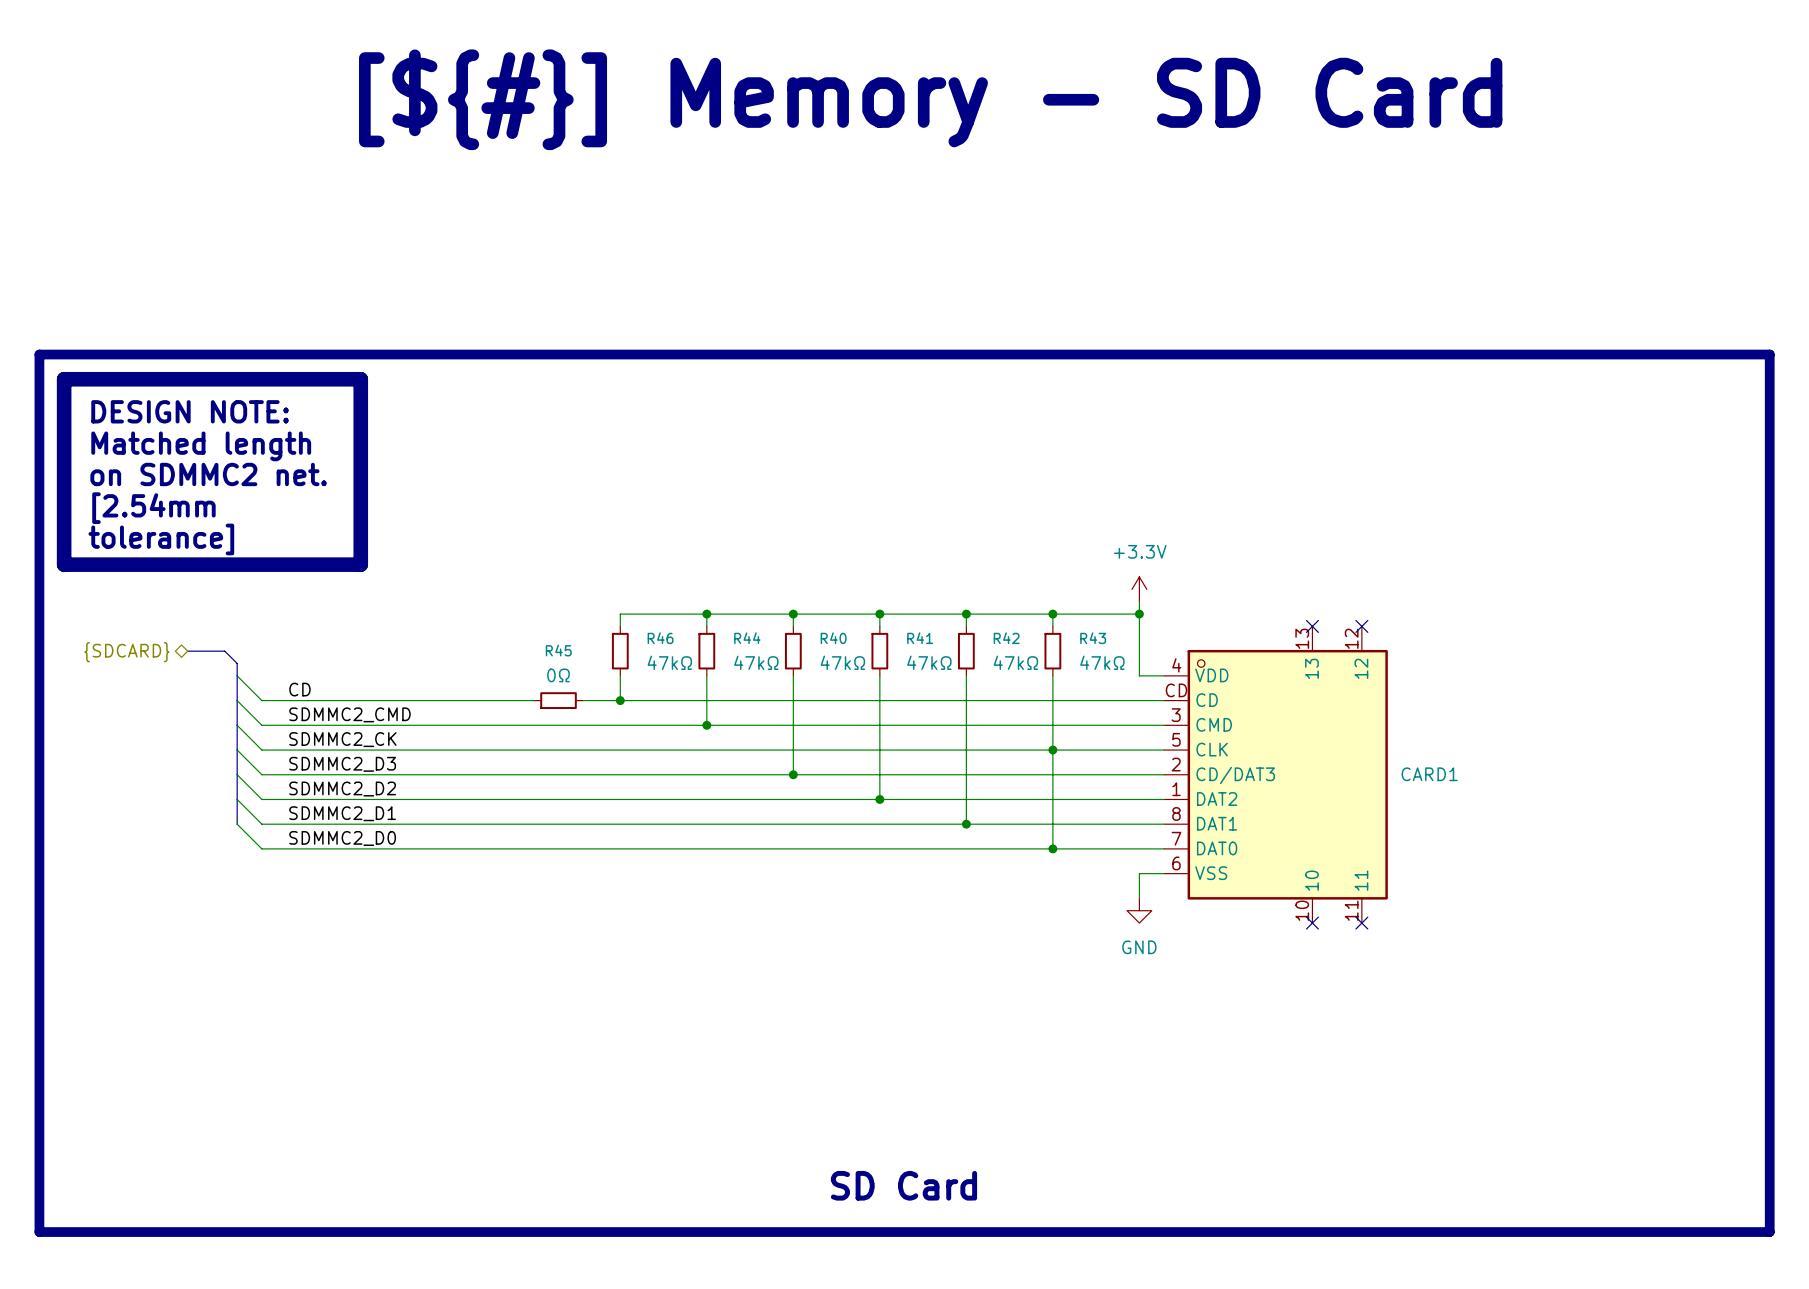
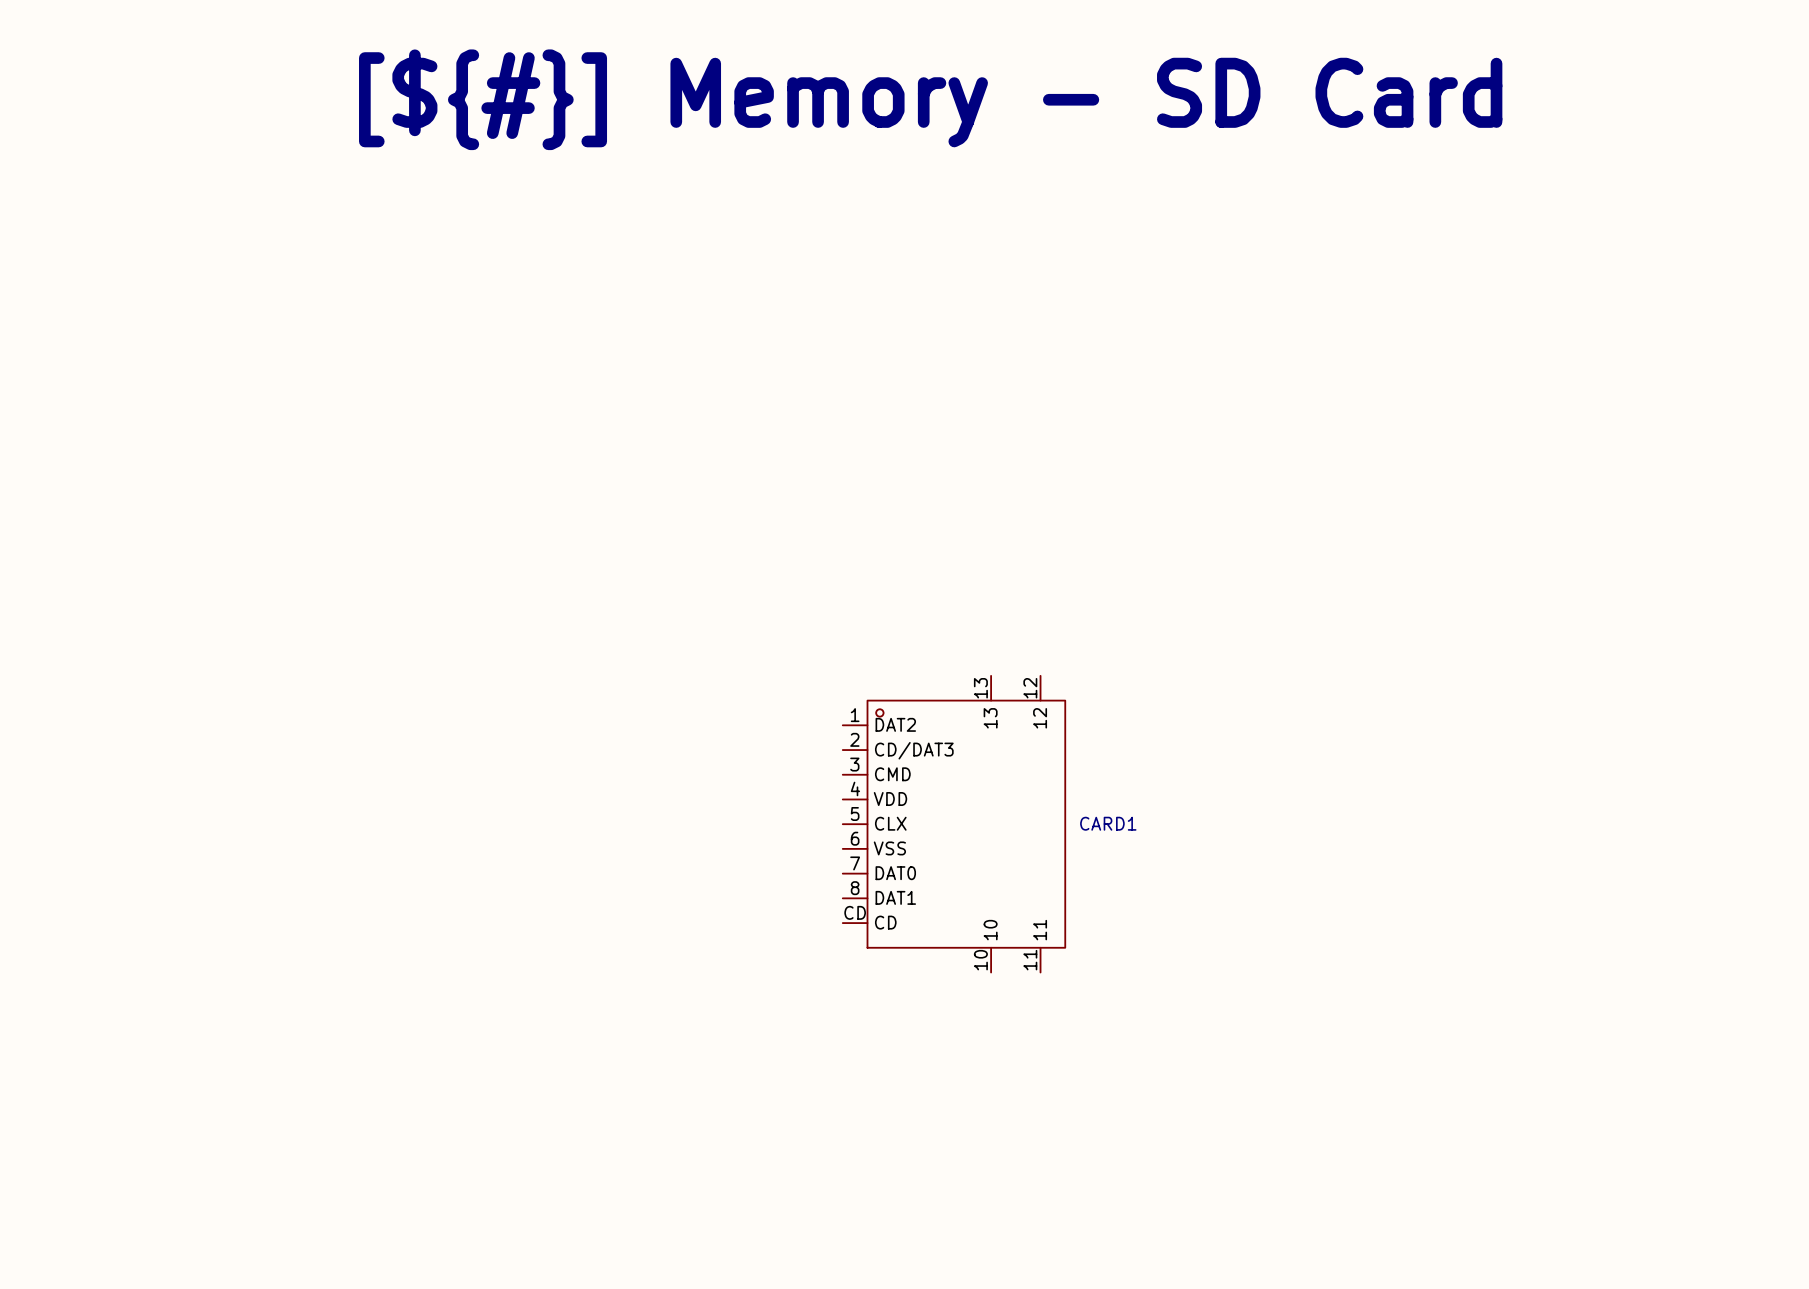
line: (39, 354) (1769, 354) (1769, 1232) (39, 1232) (39, 354) -> none
line: (64, 379) (360, 379) (360, 564) (64, 564) (64, 379) -> none
text: DESIGN NOTE: (190, 411) -> none
text: Matched length (201, 446) -> none
text: on SDMMC2 net. (208, 474) -> none
text: [2.54mm (153, 508) -> none
text: tolerance] (161, 539) -> none
power symbol: +3.3V (1139, 589) -> none
wire: (1139, 601) (1139, 675) (1164, 675) -> none
wire: (706, 614) (706, 626) -> none
junction: (706, 614) -> none
wire: (793, 614) (793, 626) -> none
junction: (793, 614) -> none
wire: (879, 614) (879, 626) -> none
junction: (879, 614) -> none
wire: (966, 614) (966, 626) -> none
junction: (966, 614) -> none
wire: (1052, 614) (1052, 626) -> none
junction: (1052, 614) -> none
wire: (1139, 614) (620, 614) (620, 626) -> none
junction: (1139, 614) -> none
CARD1 symbol: [1164, 626, 1388, 924] -> [842, 675, 1066, 973]
no-connect mark: (1312, 626) -> none
no-connect mark: (1361, 626) -> none
bus: (187, 651) (224, 651) (237, 663) (237, 824) -> none
R46: 47kΩ (620, 651) -> none
R44: 47kΩ (706, 651) -> none
R40: 47kΩ (793, 651) -> none
R41: 47kΩ (879, 651) -> none
R42: 47kΩ (966, 651) -> none
R43: 47kΩ (1052, 651) -> none
hierarchical label: {SDCARD} (126, 652) -> none
wire: (237, 675) (261, 700) (533, 700) -> none
wire: (620, 675) (620, 700) -> none
wire: (706, 675) (706, 725) -> none
wire: (793, 675) (793, 774) -> none
wire: (879, 675) (879, 799) -> none
wire: (966, 675) (966, 824) -> none
wire: (1052, 675) (1052, 848) -> none
label: CD (299, 689) -> none
wire: (237, 700) (261, 725) (1164, 725) -> none
R45: 0Ω (558, 700) -> none
wire: (583, 700) (1164, 700) -> none
junction: (620, 700) -> none
label: SDMMC2_CMD (349, 714) -> none
wire: (237, 725) (261, 750) (1164, 750) -> none
junction: (706, 725) -> none
label: SDMMC2_CK (342, 739) -> none
wire: (237, 750) (261, 774) (1164, 774) -> none
junction: (1052, 750) -> none
label: SDMMC2_D3 (342, 764) -> none
wire: (237, 774) (261, 799) (1164, 799) -> none
junction: (793, 774) -> none
label: SDMMC2_D2 (342, 789) -> none
wire: (237, 799) (261, 824) (1164, 824) -> none
junction: (879, 799) -> none
label: SDMMC2_D1 (342, 813) -> none
wire: (237, 824) (261, 848) (1164, 848) -> none
junction: (966, 824) -> none
label: SDMMC2_D0 (342, 838) -> none
junction: (1052, 848) -> none
wire: (1164, 873) (1139, 873) (1139, 898) -> none
power symbol: GND (1139, 910) -> none
no-connect mark: (1312, 923) -> none
no-connect mark: (1361, 923) -> none
text: SD Card (903, 1185) -> none

